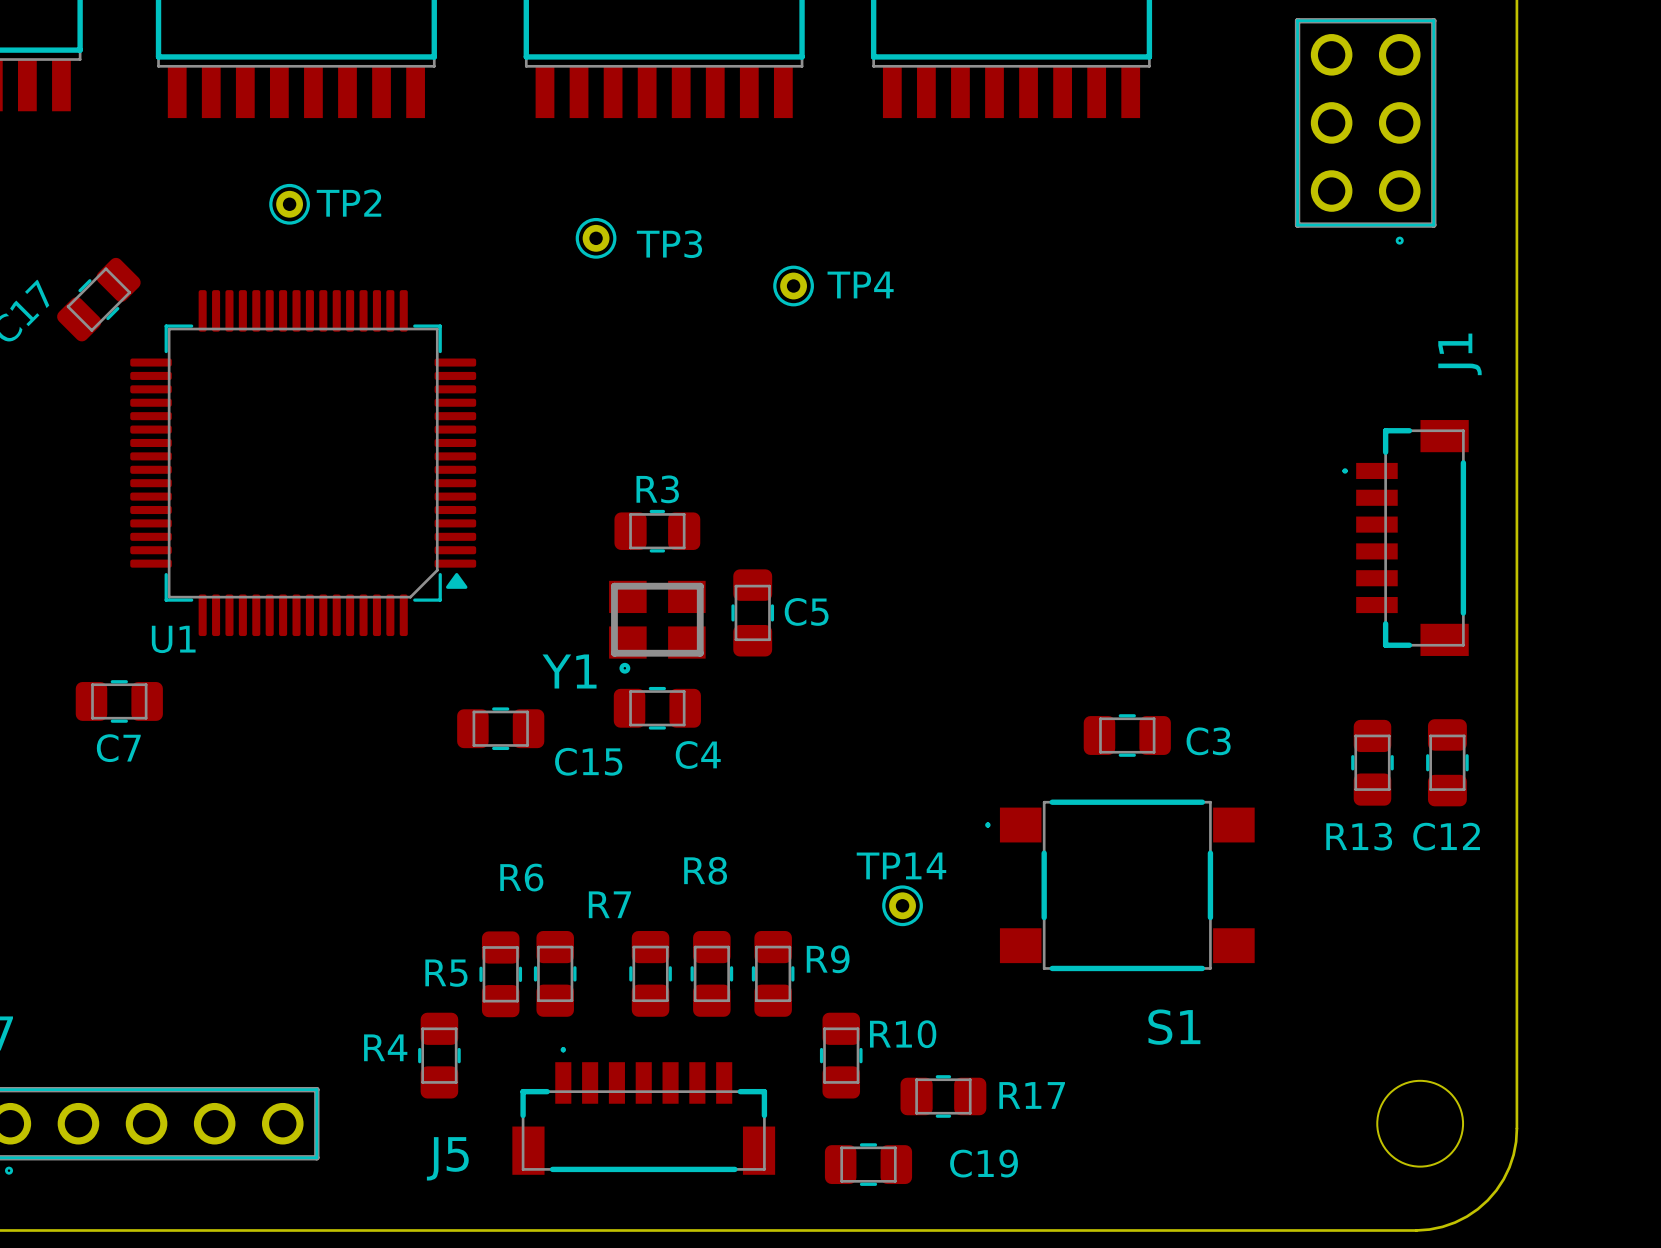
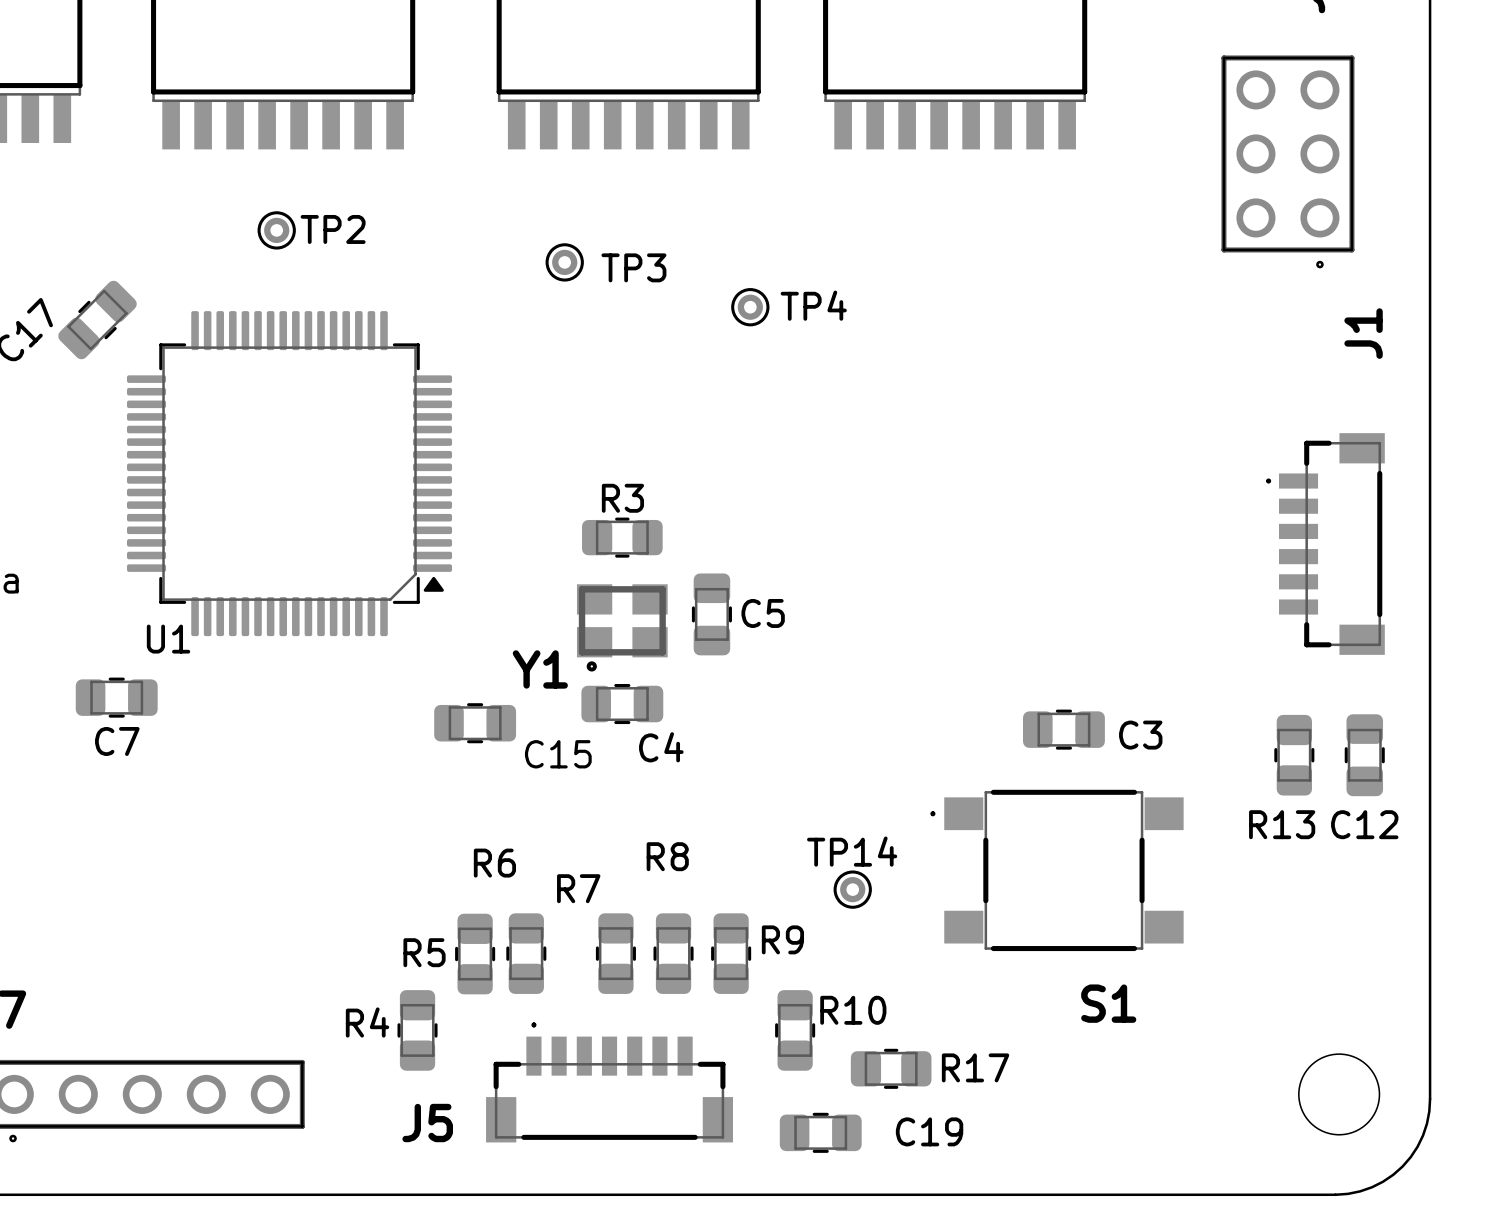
J1 name position: J1 (1459, 354) -> J1 (1363, 333)

